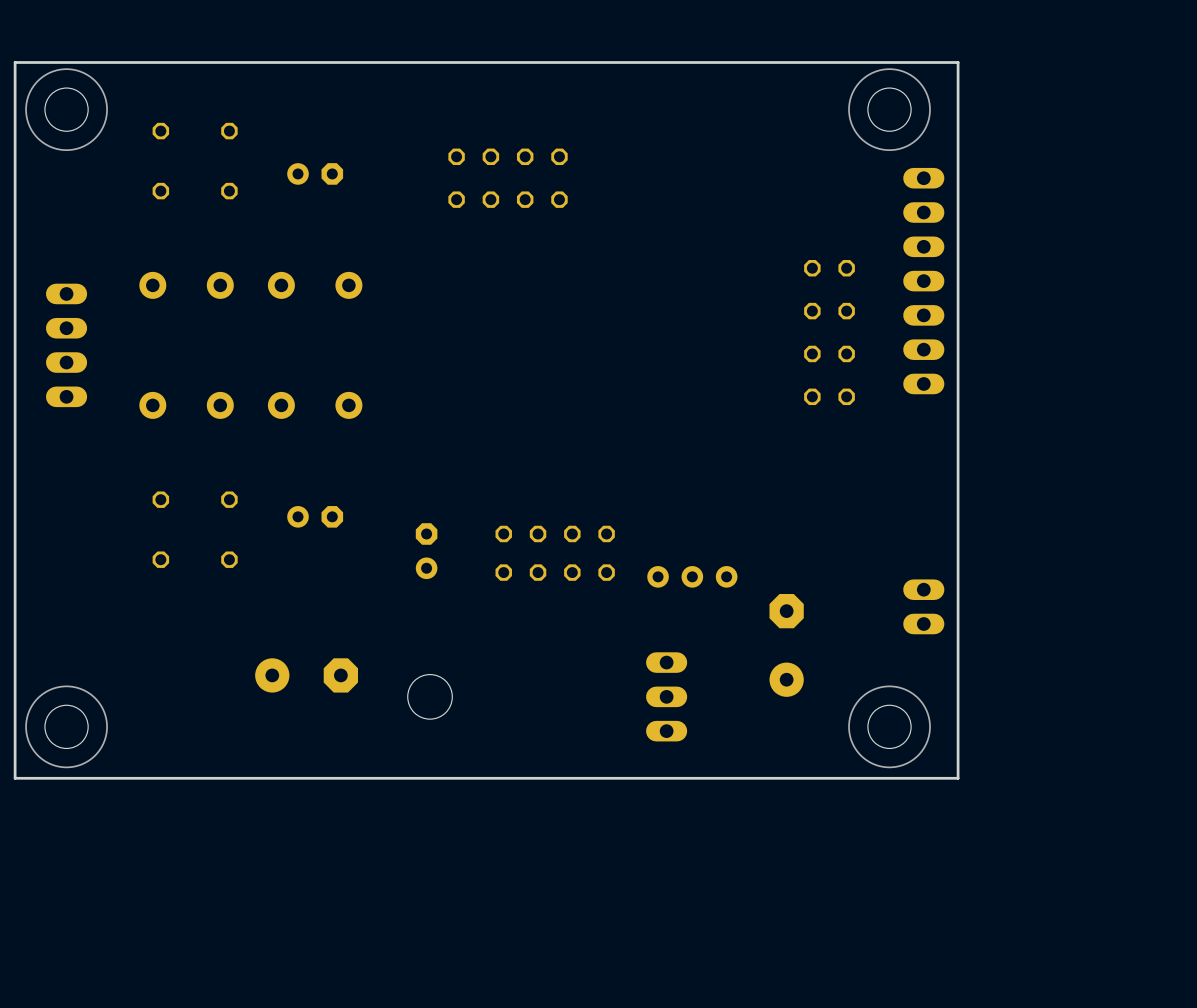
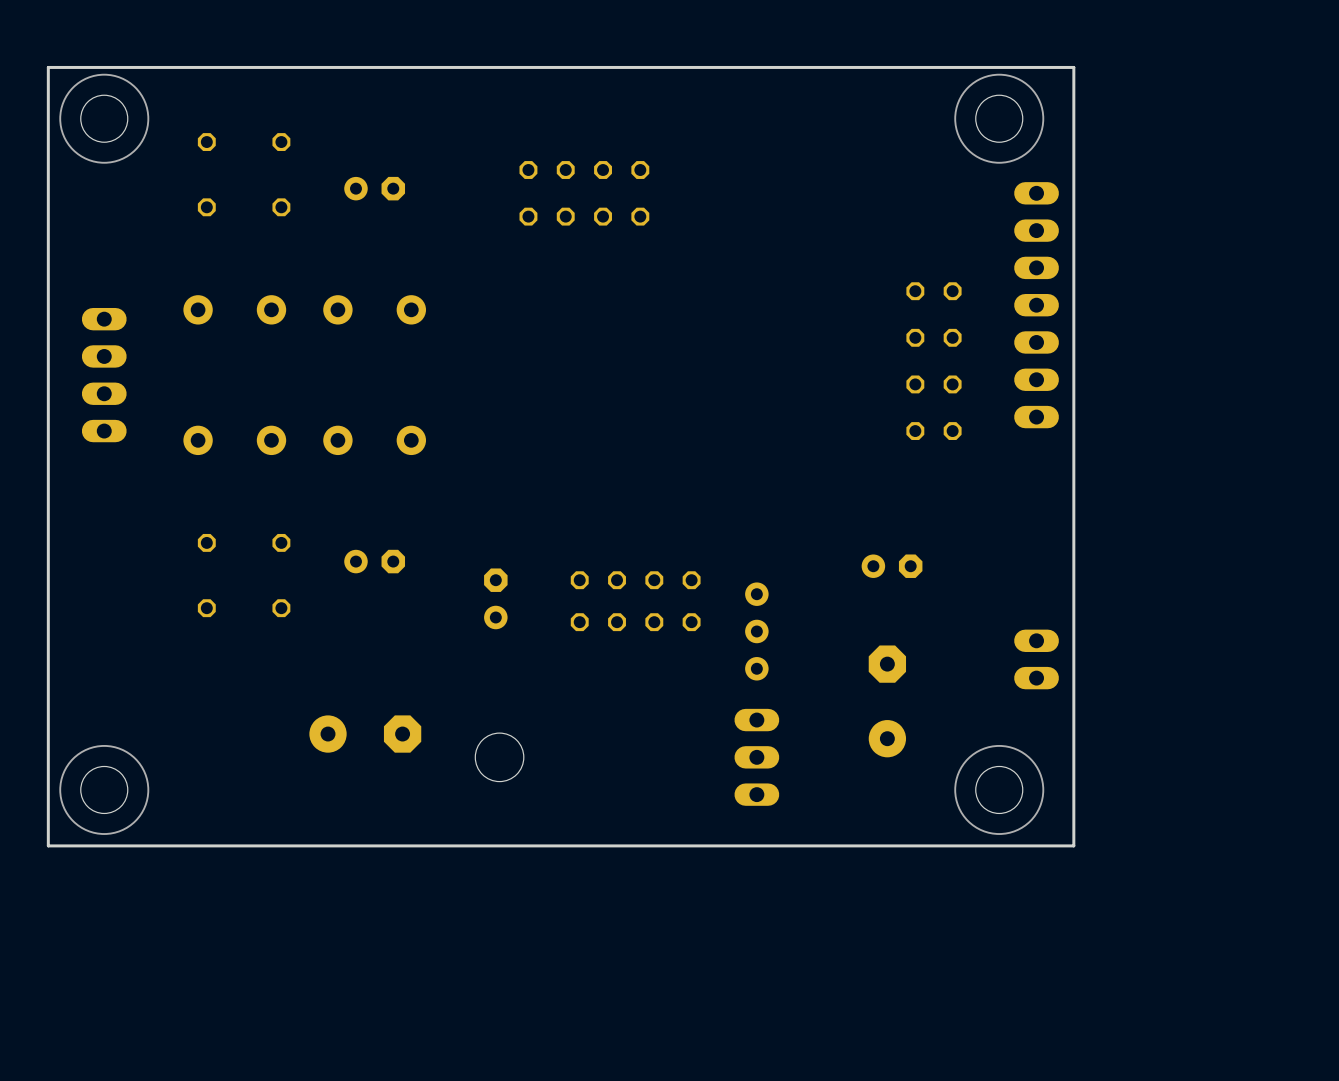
part: none -> (892, 566)
part rotation: 0° (692, 576) -> 90° clockwise (756, 631)

